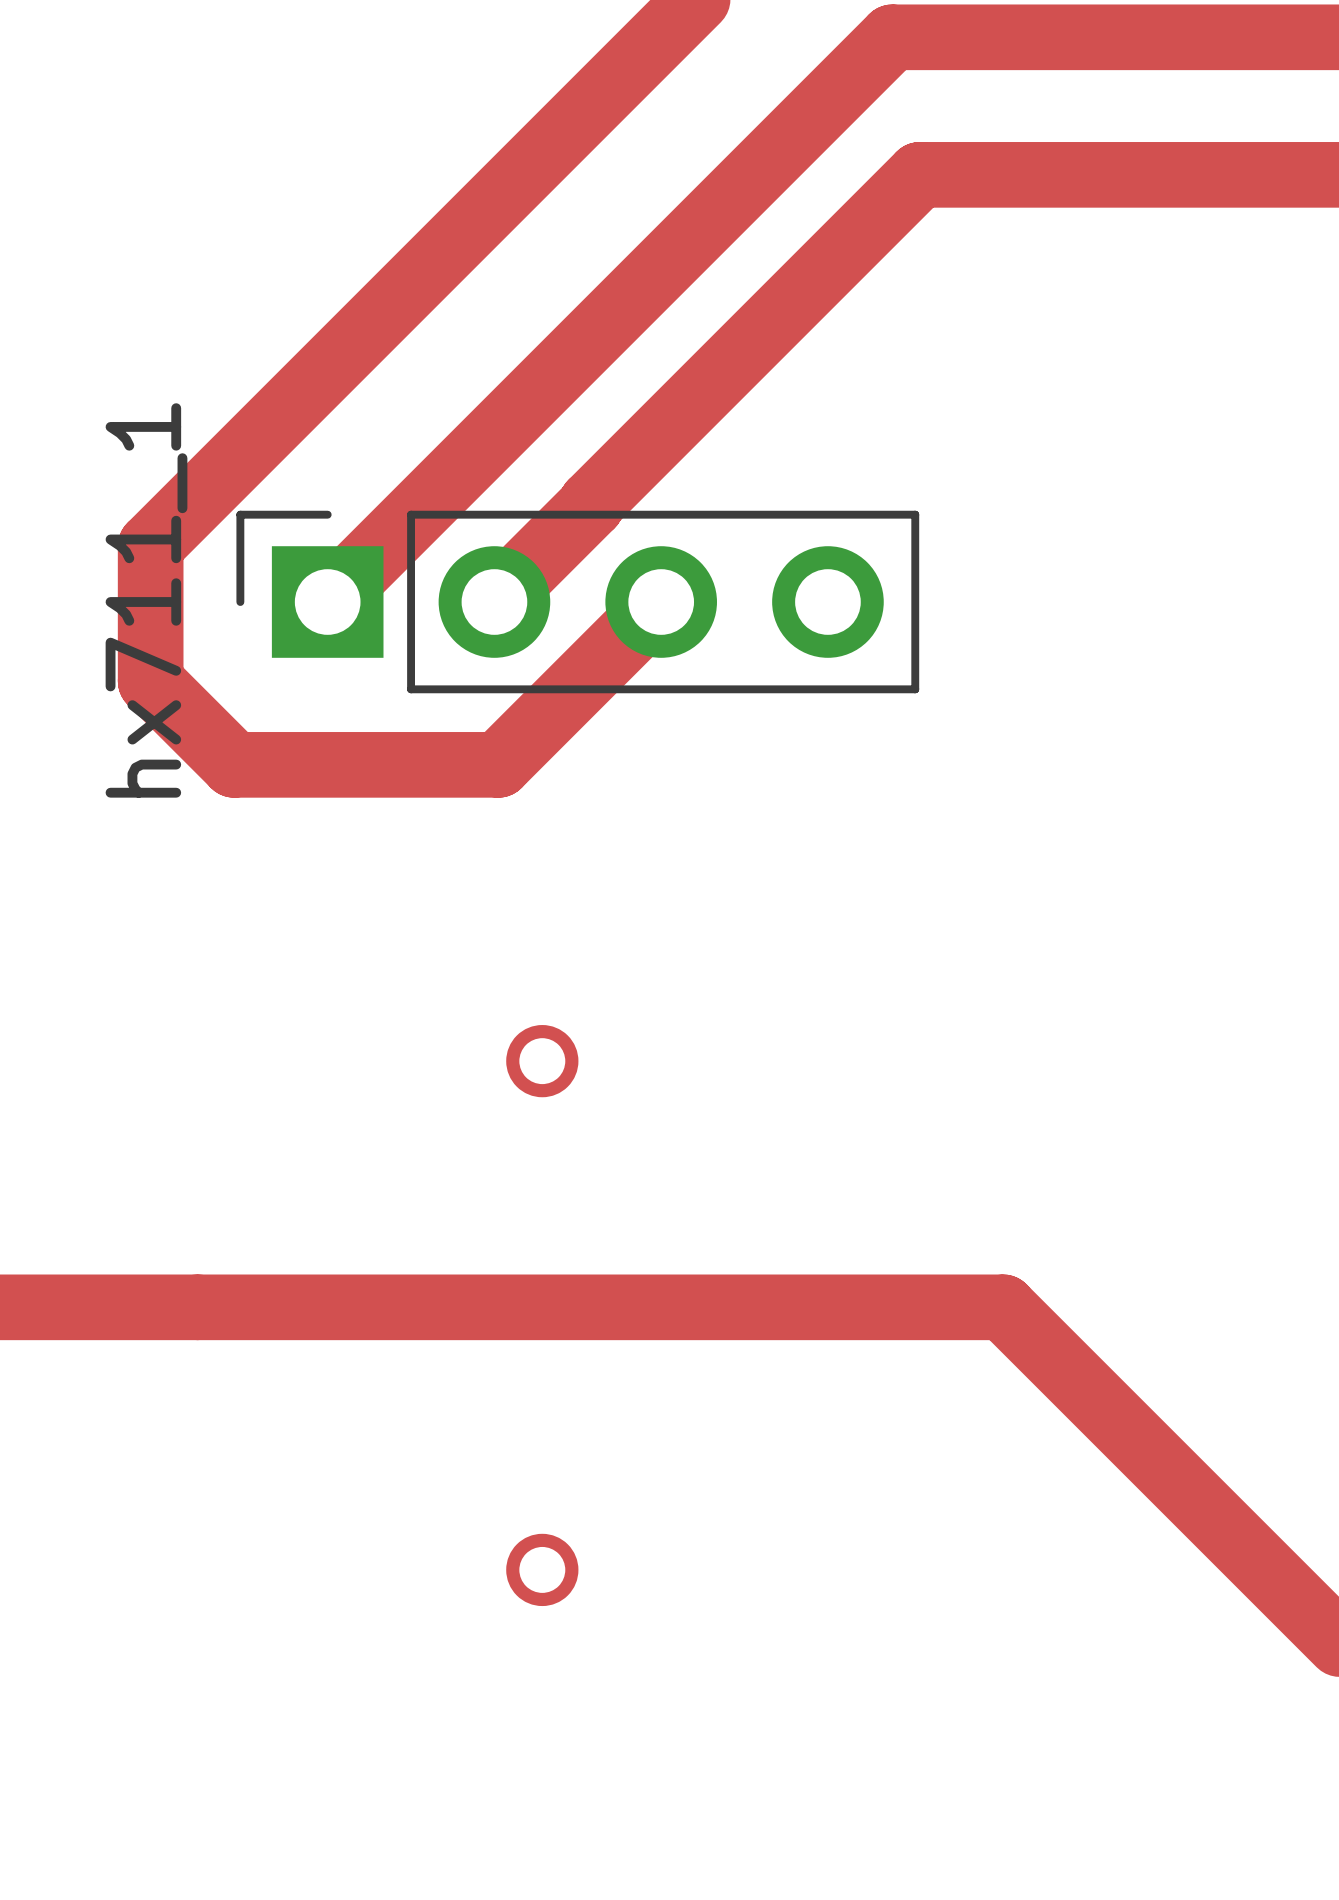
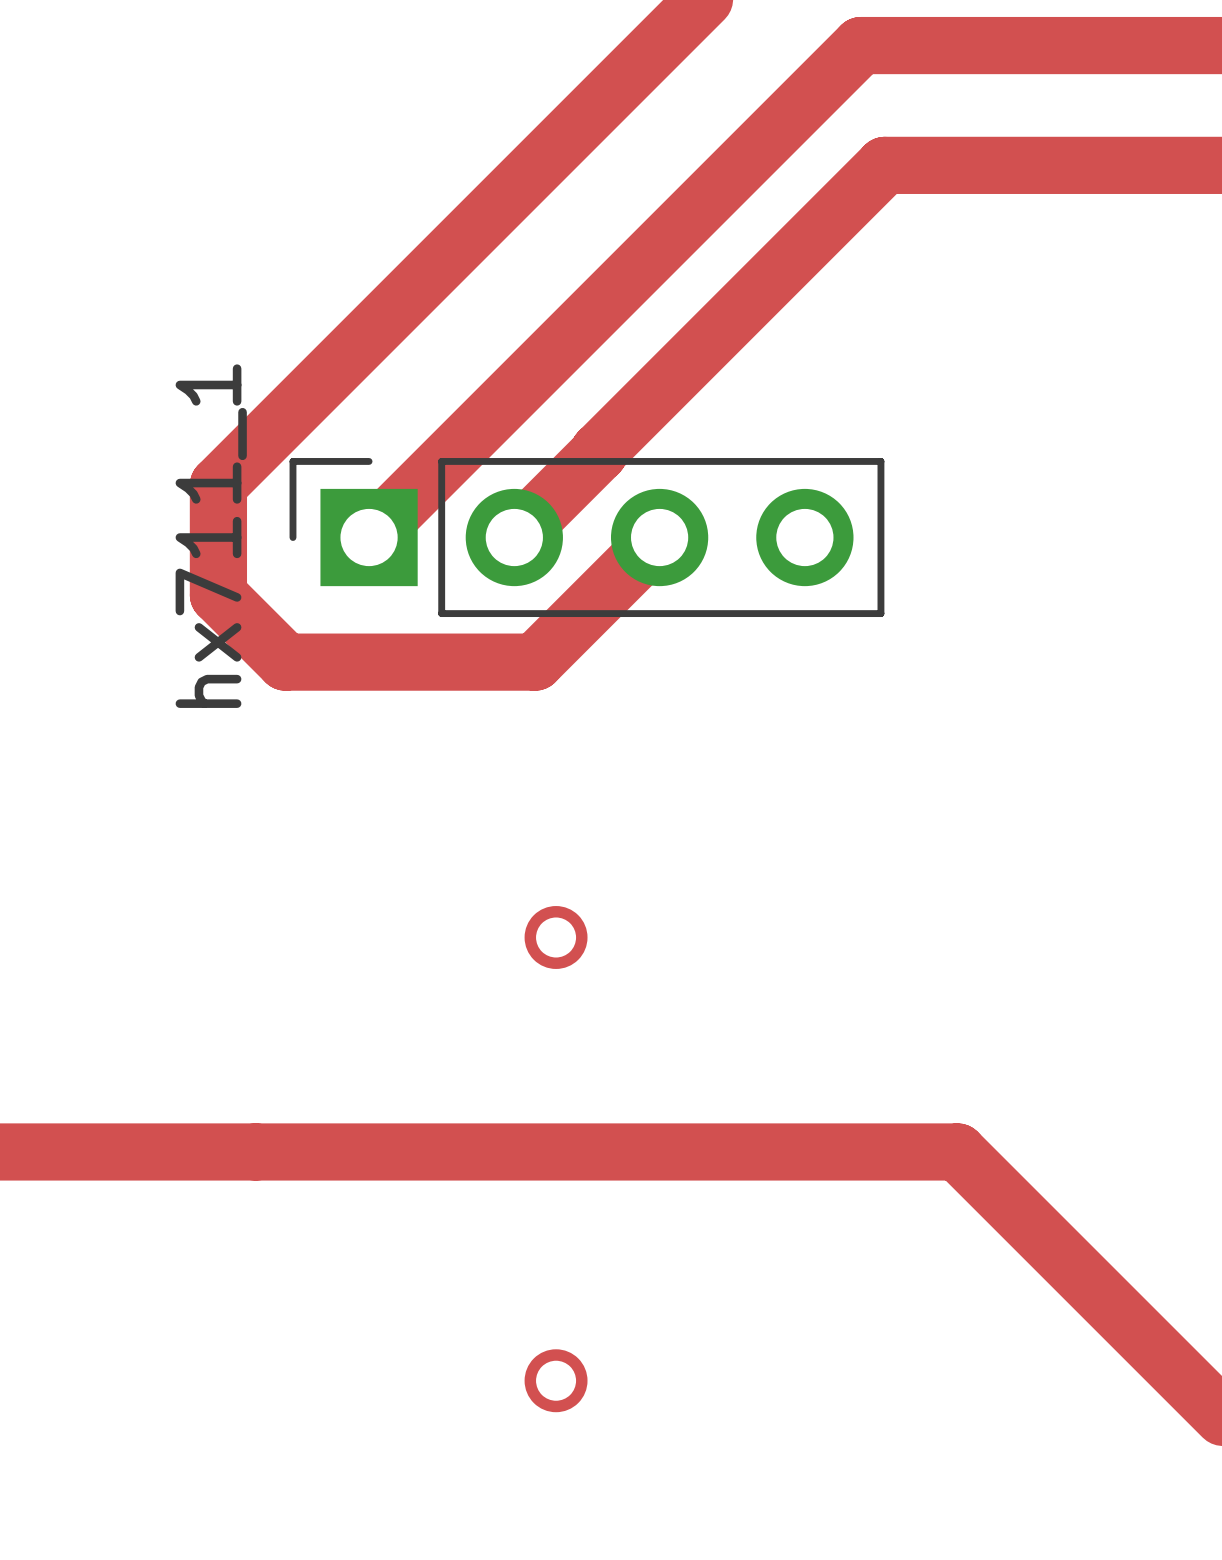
top track: (154, 541) (150, 546) (150, 681) (234, 764) (498, 764) (518, 745) -> (218, 485) (218, 594) (285, 662) (534, 662)

